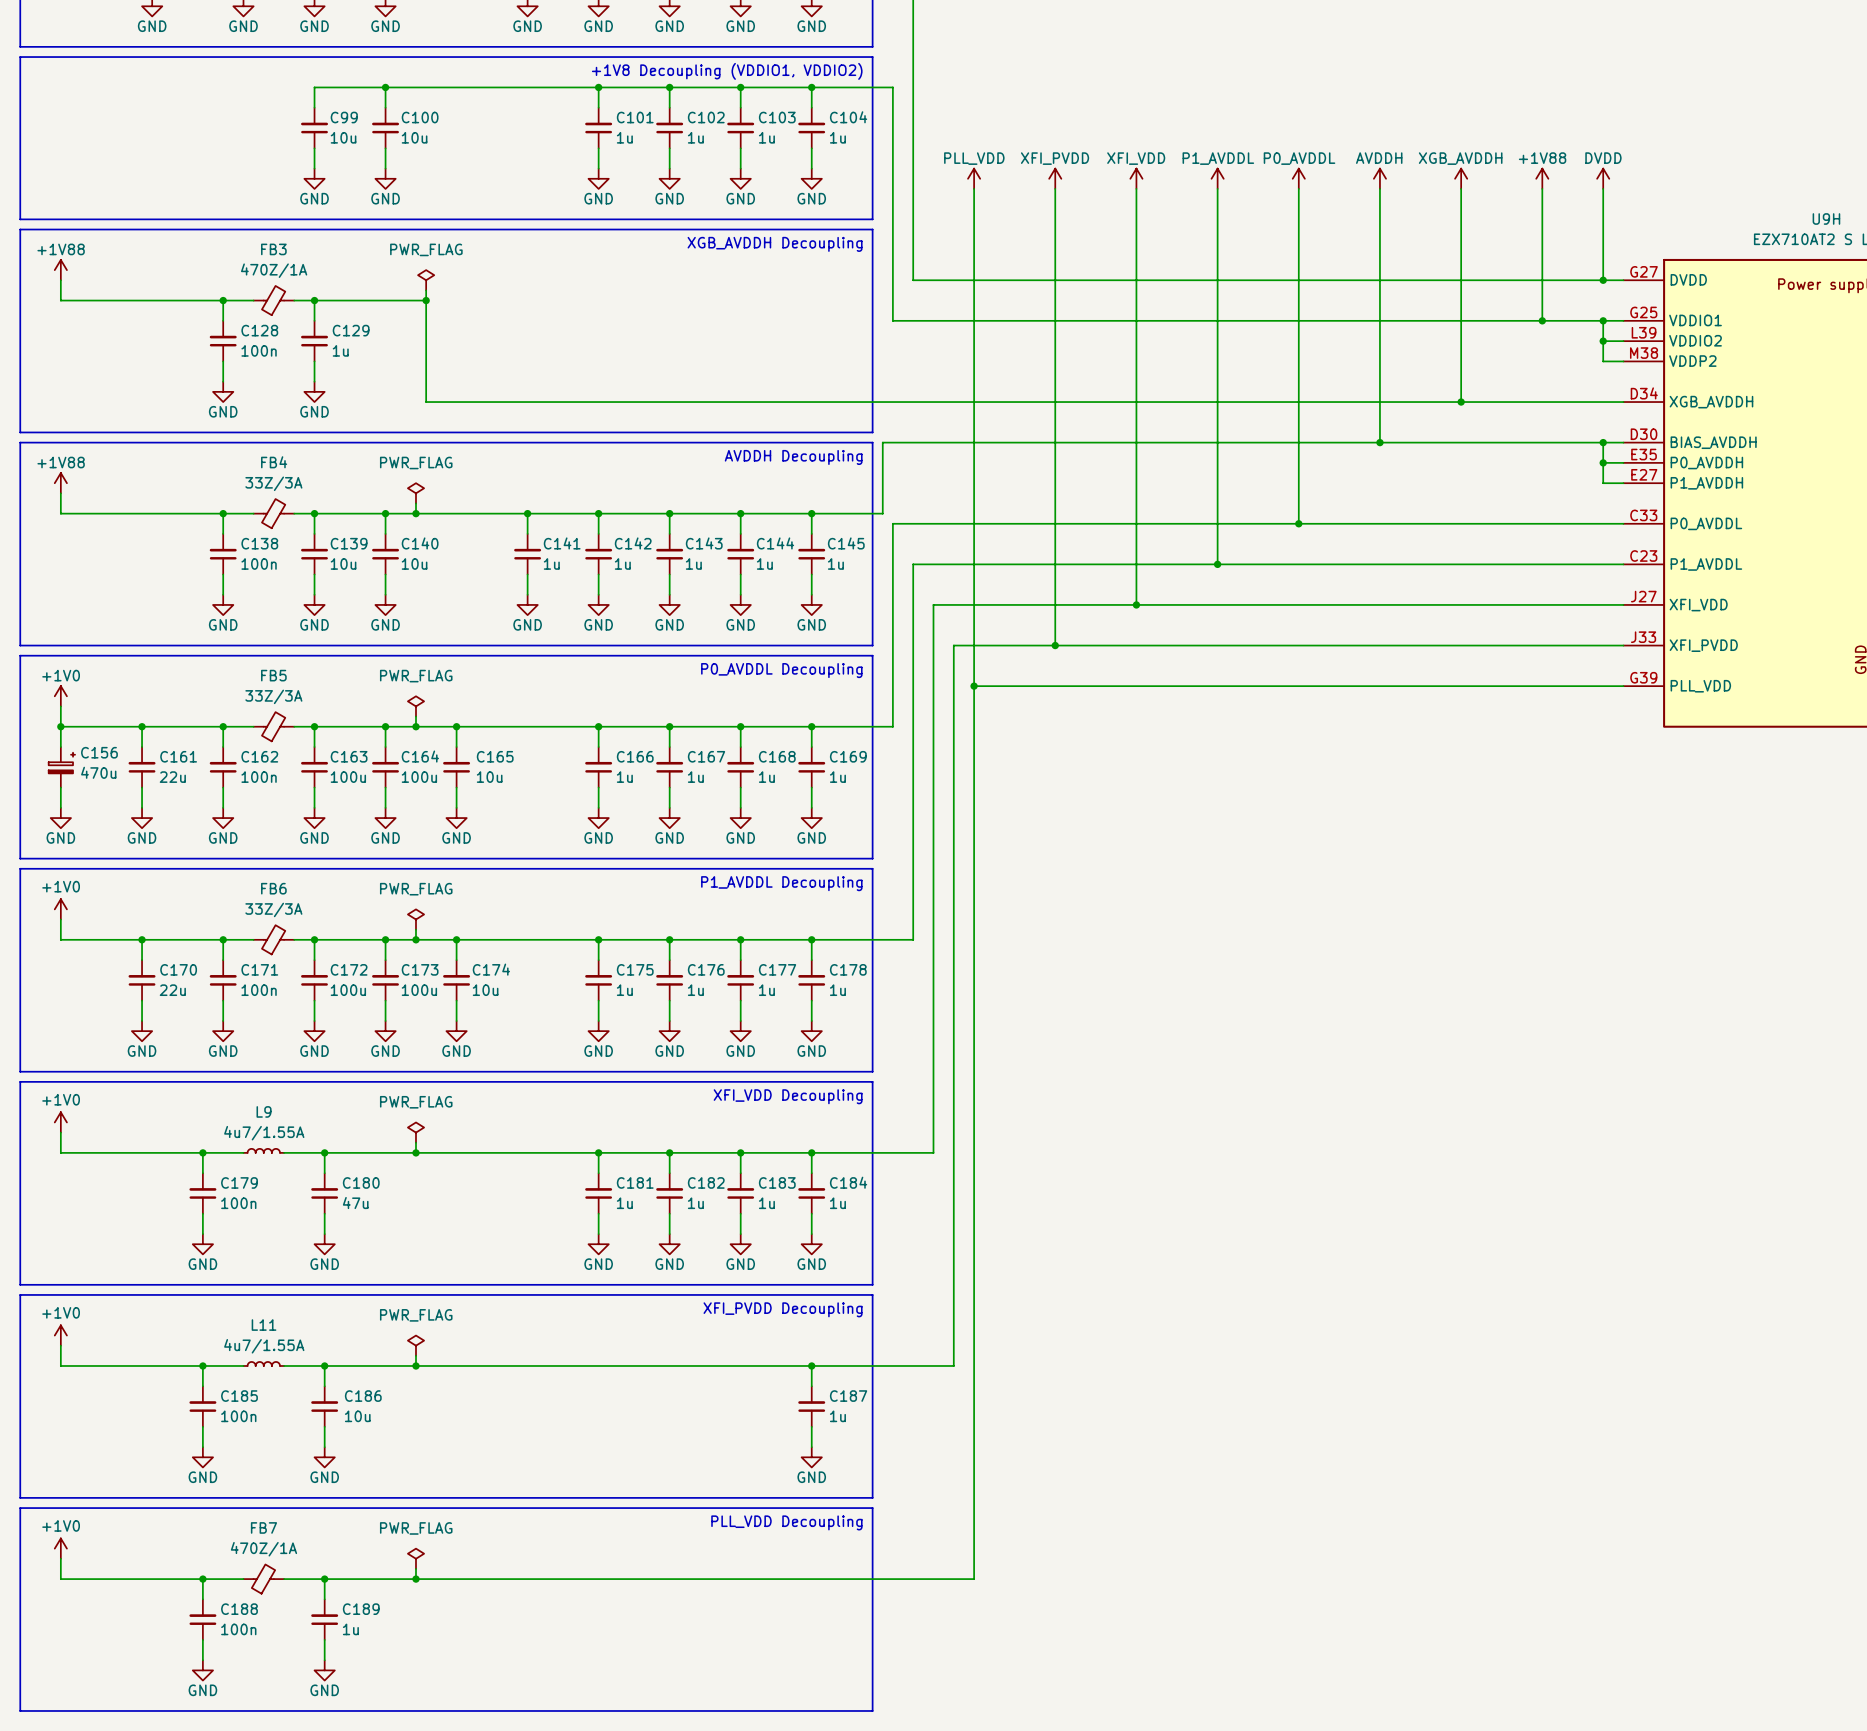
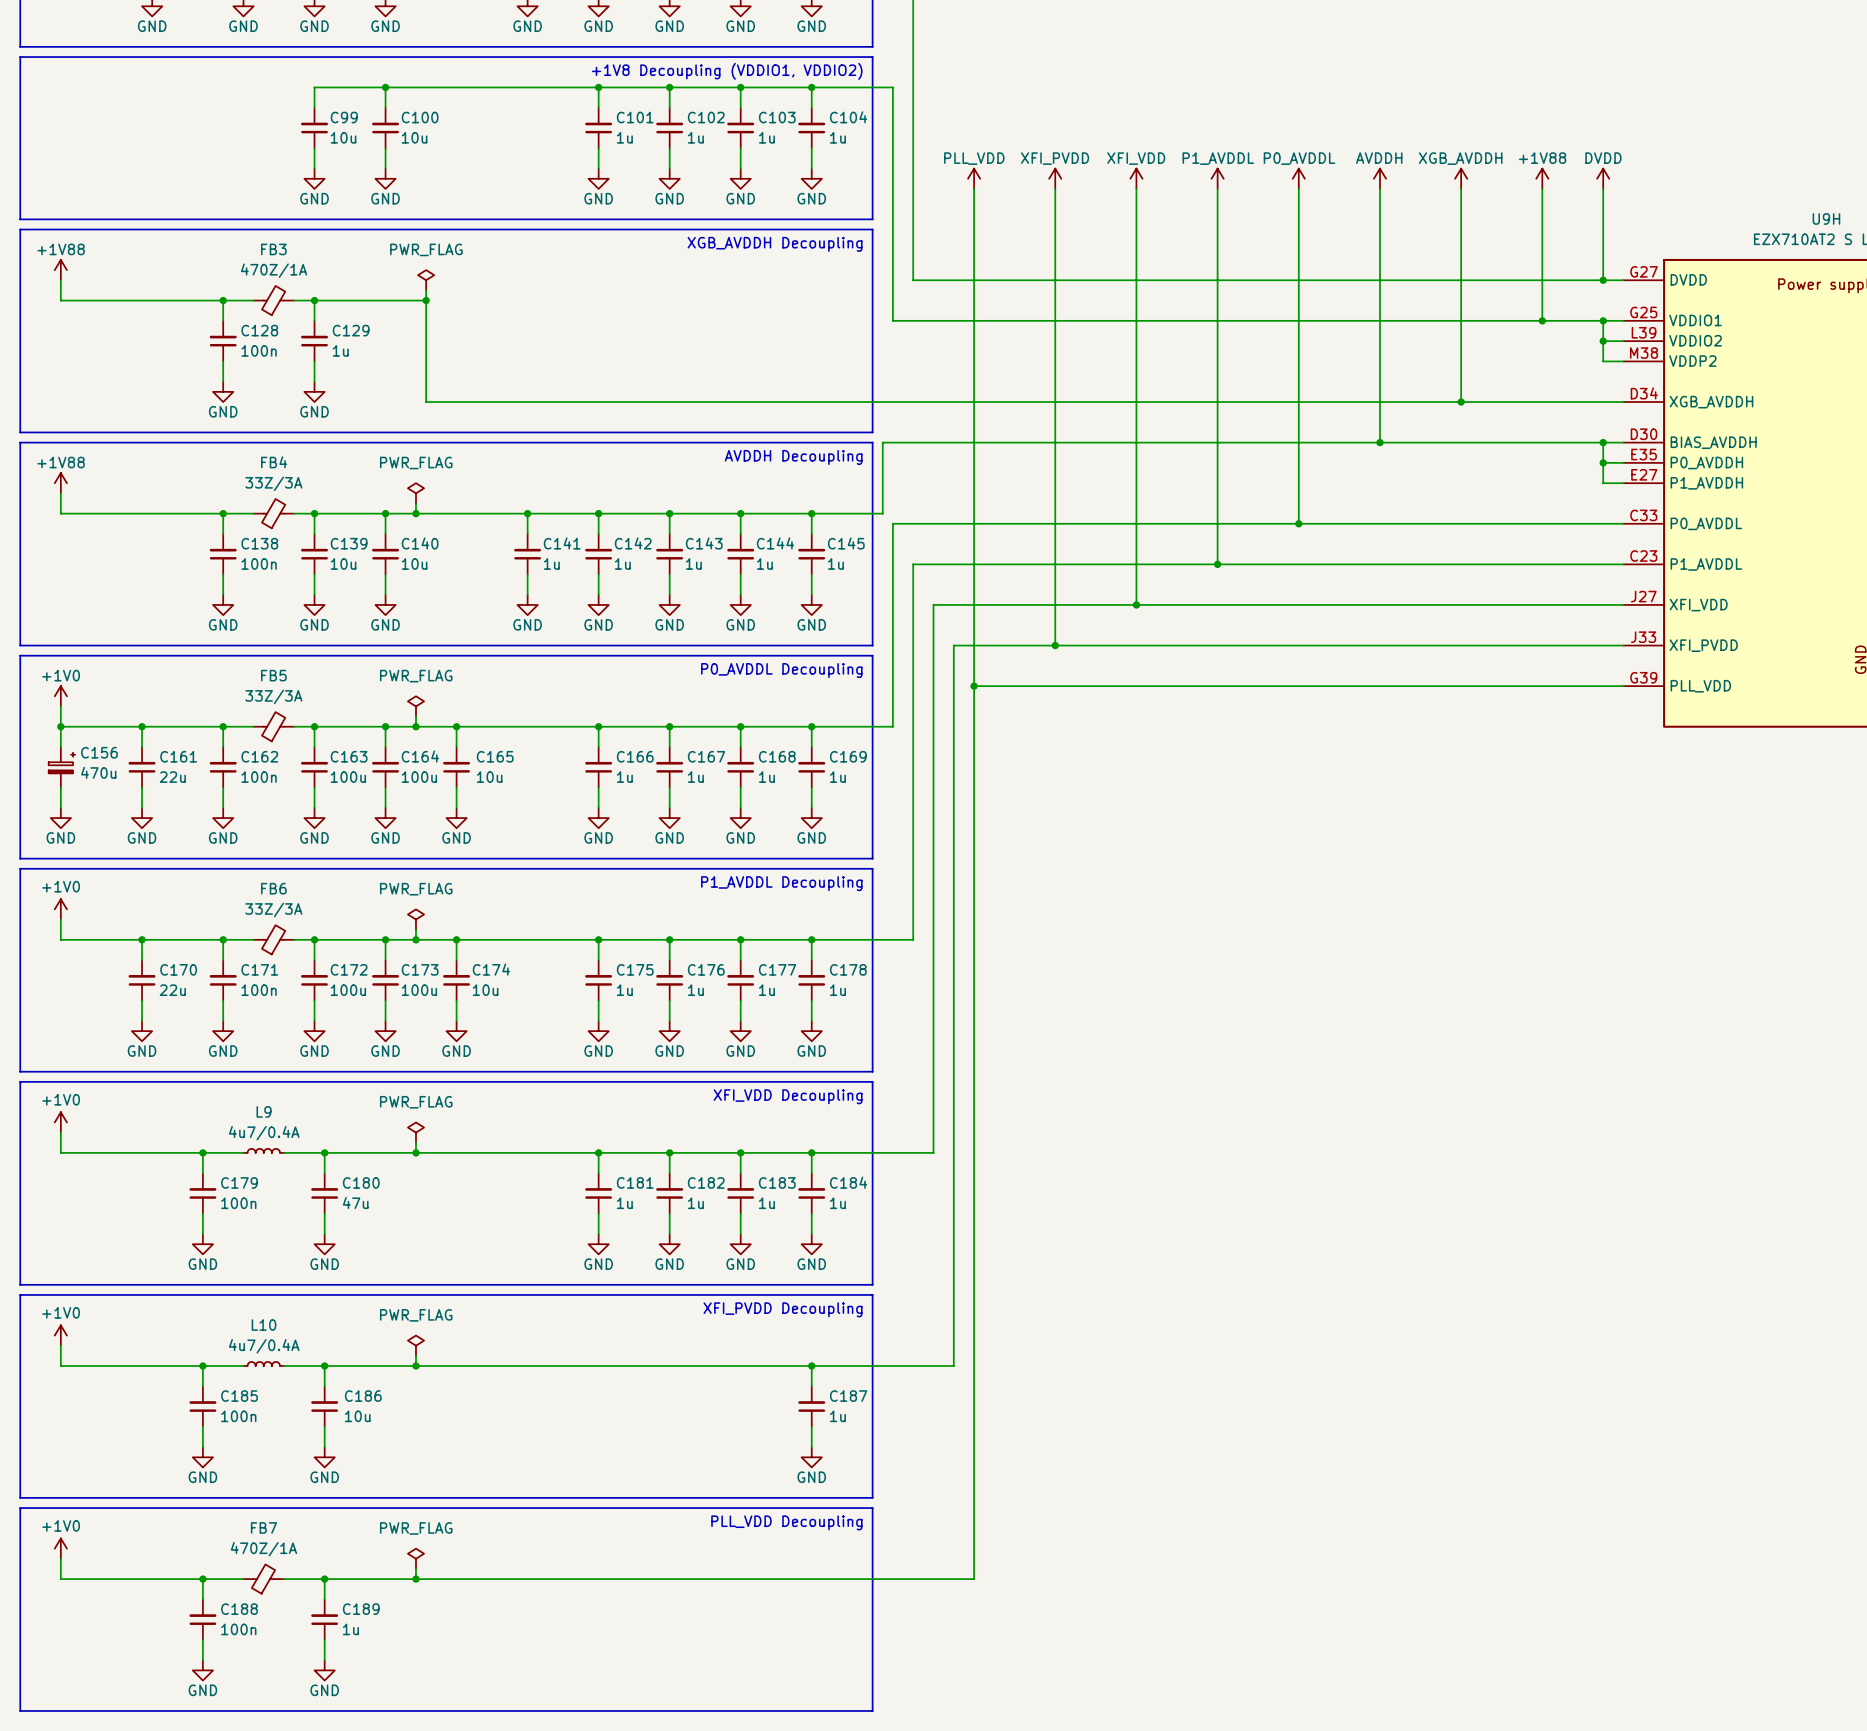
L9 text: 4u7/1.55A (264, 1133) -> 4u7/0.4A (264, 1133)
L11 name: L11 (264, 1325) -> L10 (264, 1325)
L11 text: 4u7/1.55A (264, 1346) -> 4u7/0.4A (264, 1346)

